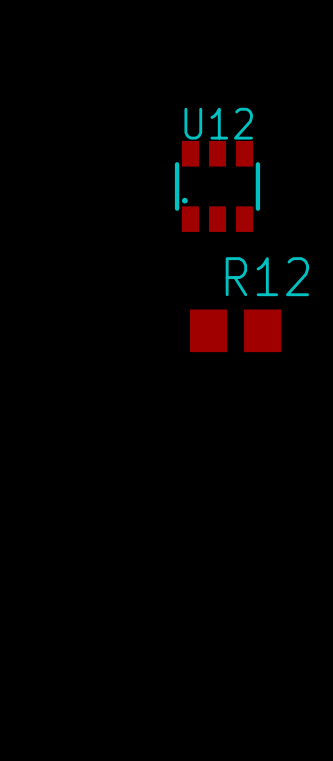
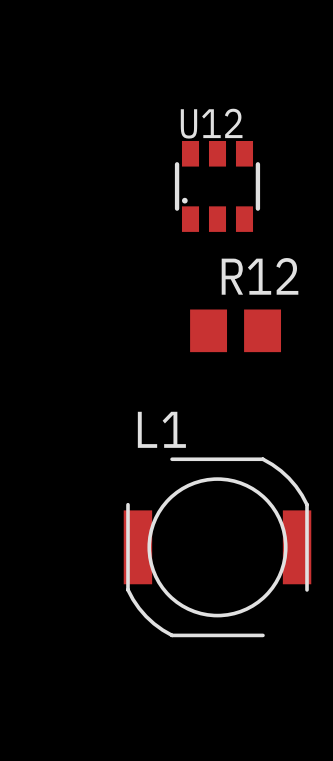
L1: none -> (217, 547)

